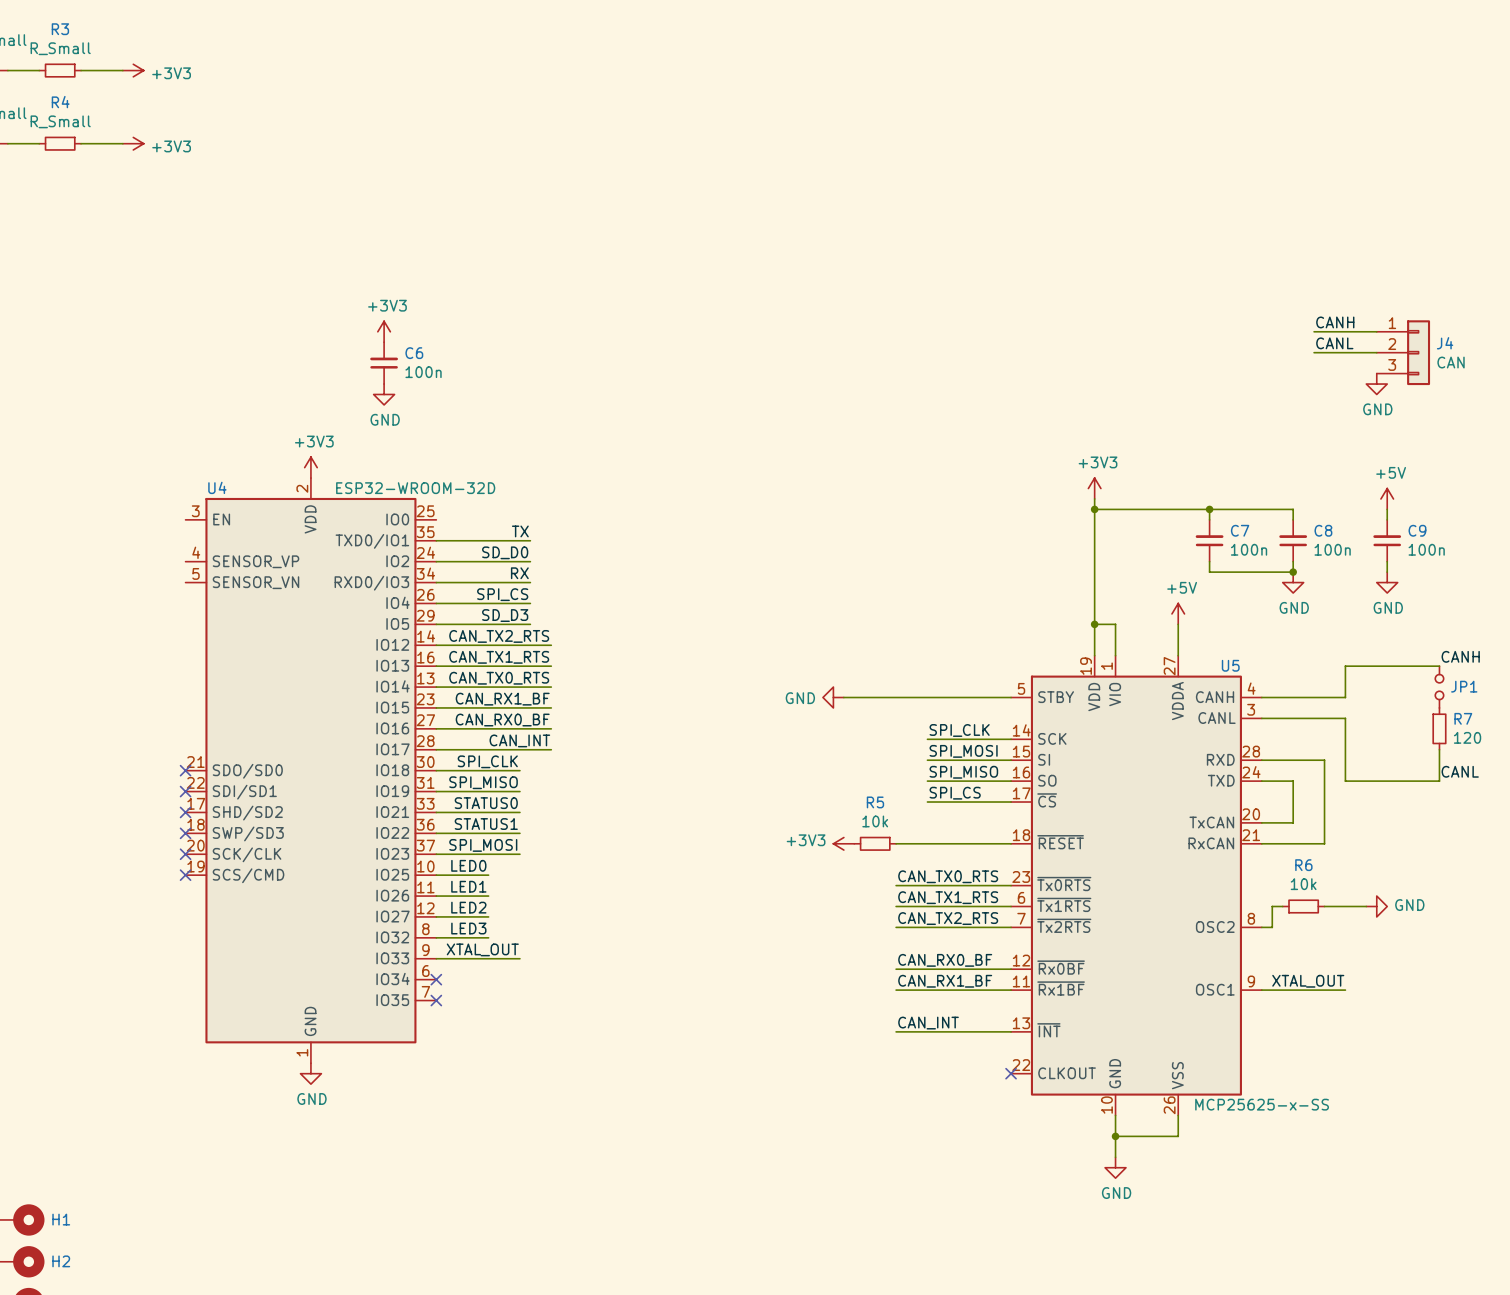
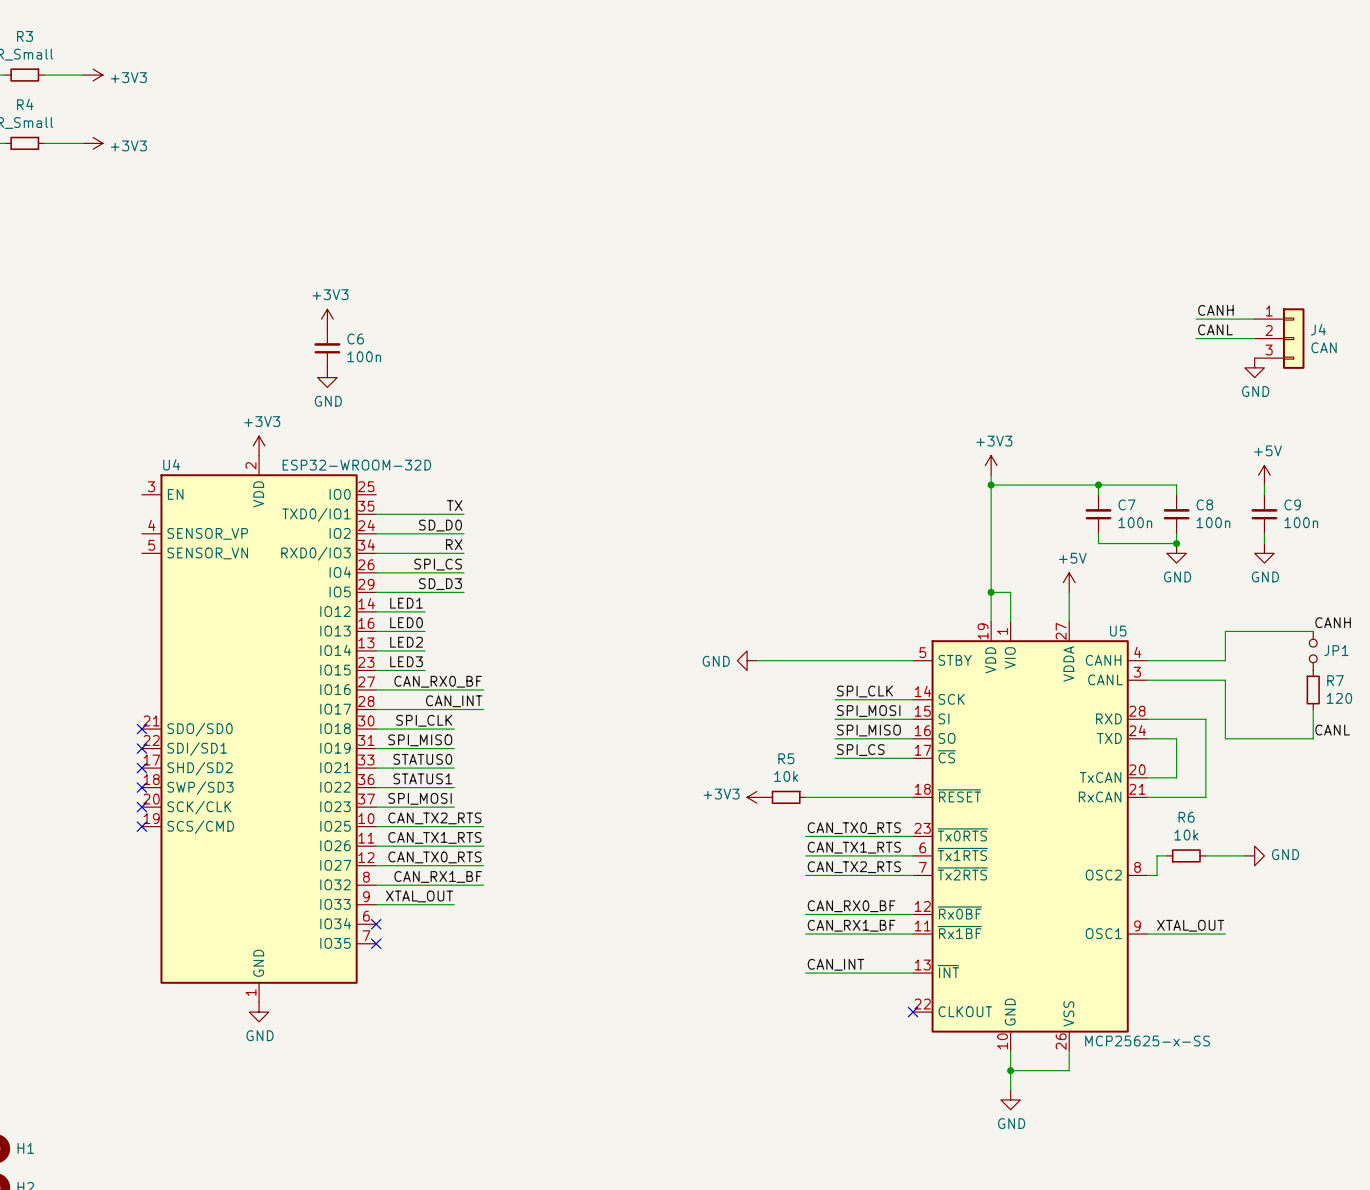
label: none -> LED1 (406, 603)
label: CAN_TX2_RTS (499, 636) -> none
wire: (488, 645) (551, 645) -> none
label: none -> LED0 (406, 622)
label: CAN_TX1_RTS (499, 657) -> none
wire: (488, 666) (551, 666) -> none
label: none -> LED2 (406, 642)
label: CAN_TX0_RTS (499, 678) -> none
wire: (488, 687) (551, 687) -> (424, 826) (483, 826)
label: none -> LED3 (406, 661)
label: CAN_RX1_BF (502, 699) -> none
wire: (488, 707) (551, 707) -> (424, 846) (483, 846)
label: LED0 (468, 865) -> none
label: none -> CAN_TX2_RTS (434, 818)
label: LED1 (468, 886) -> none
label: none -> CAN_TX1_RTS (434, 837)
label: LED2 (468, 907) -> none
label: none -> CAN_TX0_RTS (434, 857)
wire: none -> (424, 865) (483, 865)
label: LED3 (468, 928) -> none
label: none -> CAN_RX1_BF (438, 876)
wire: none -> (424, 885) (483, 885)

